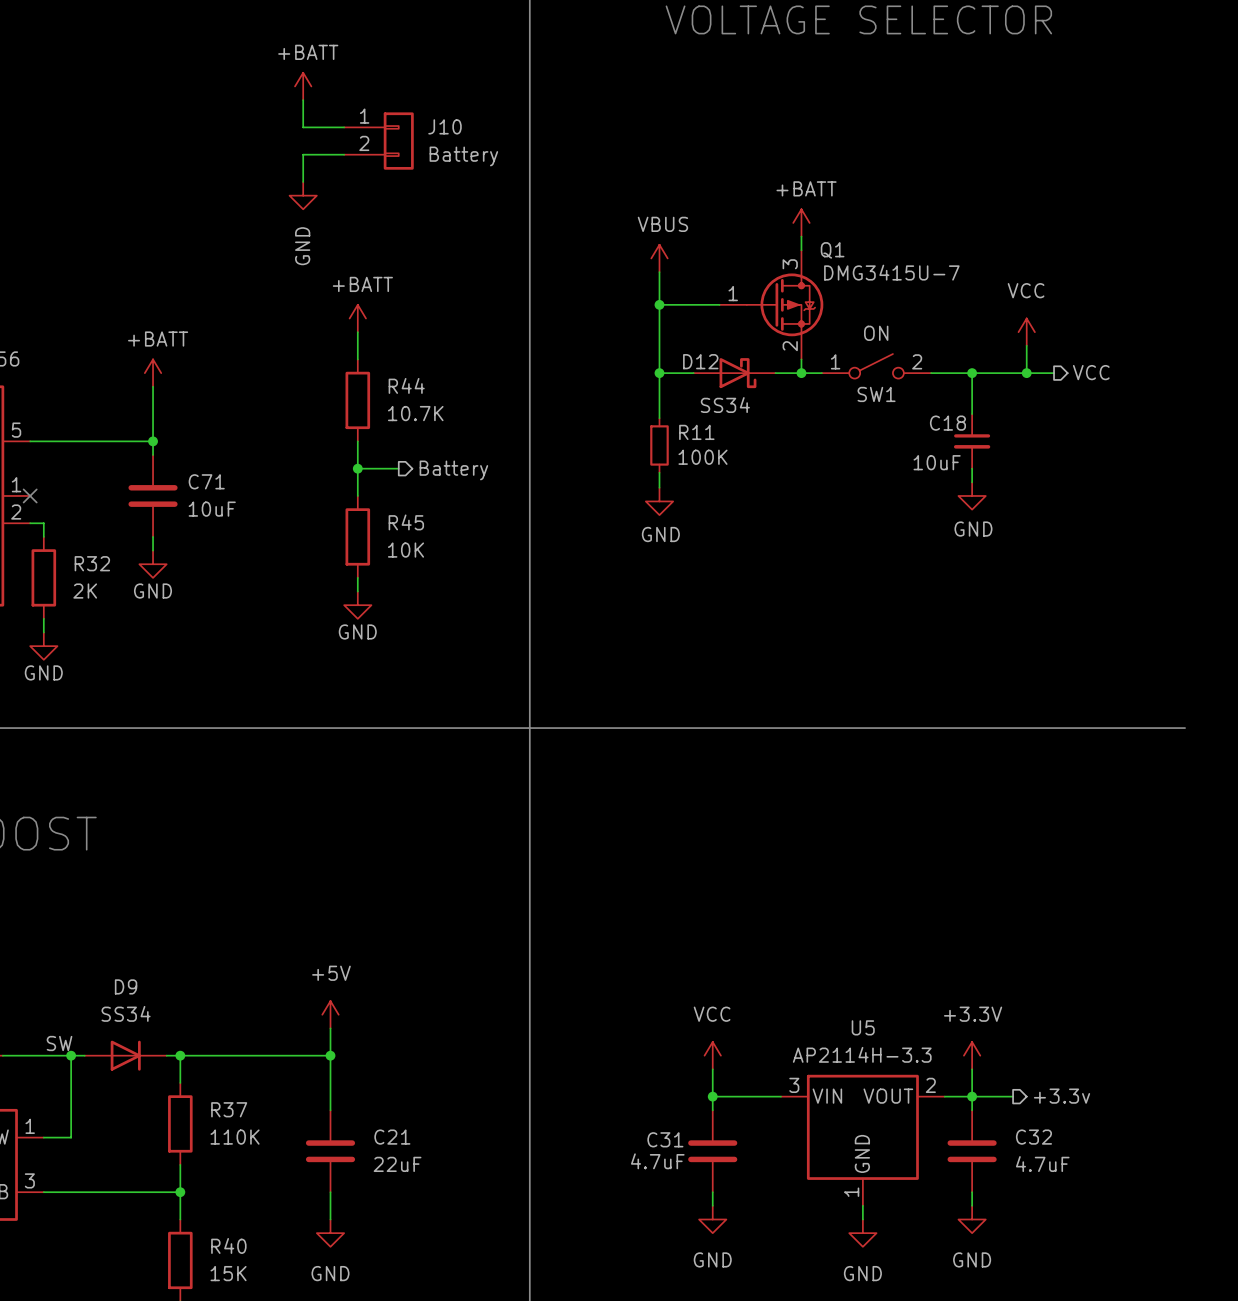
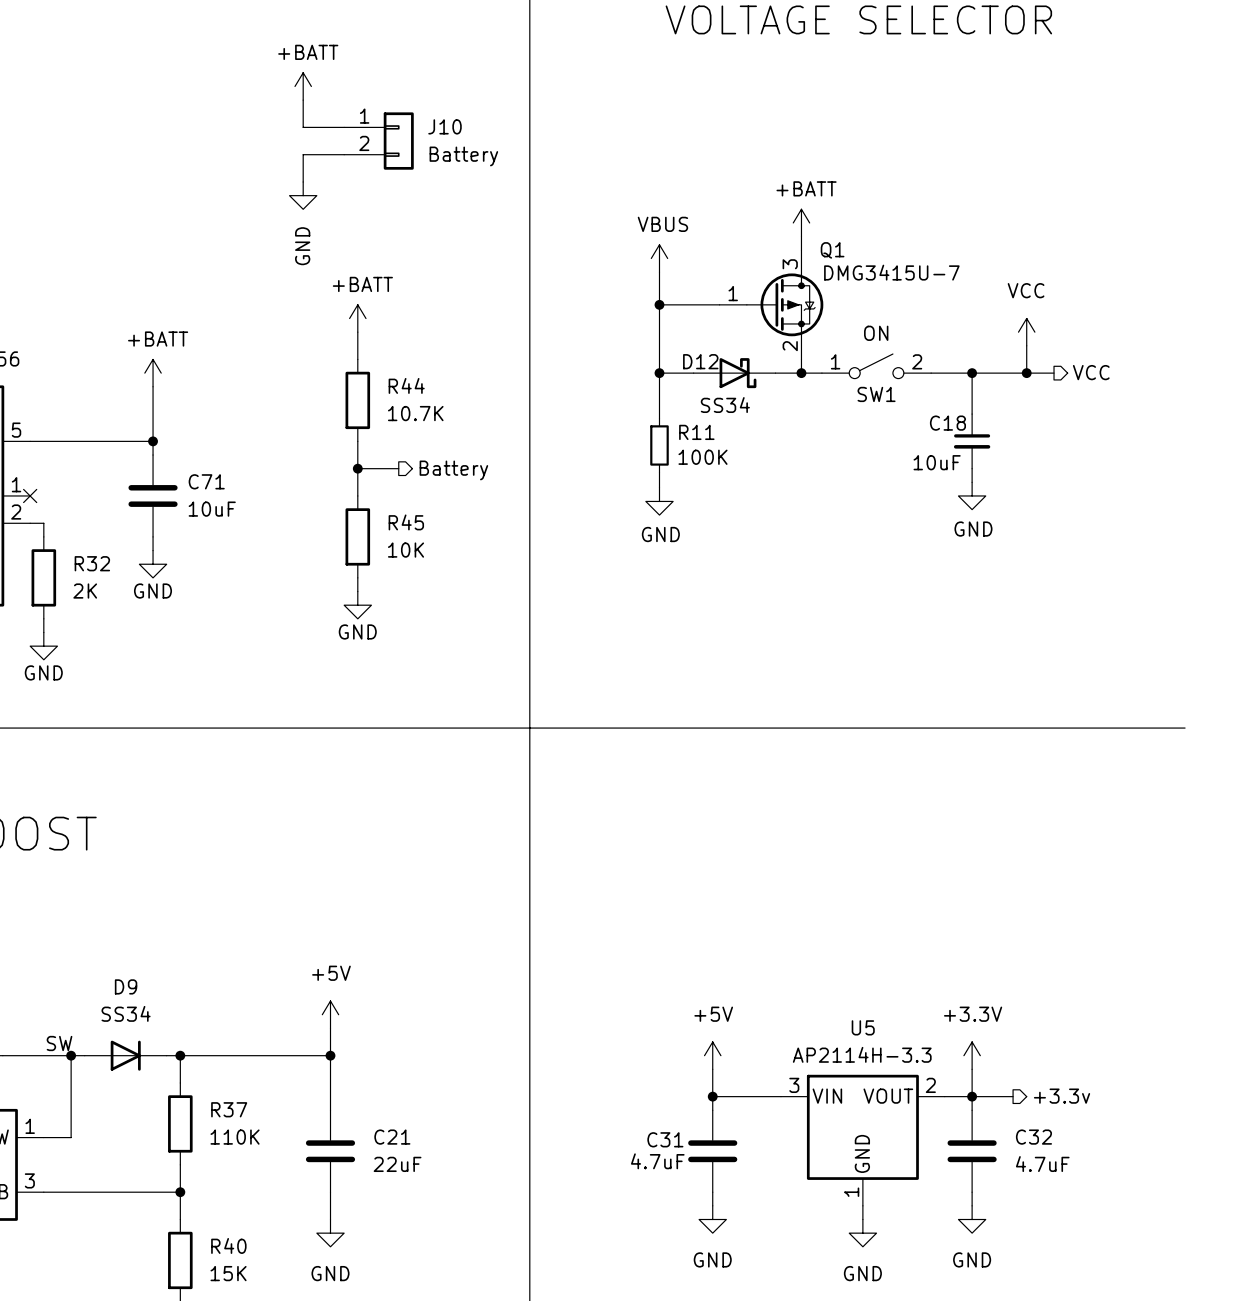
power symbol: VCC (712, 1055) -> +5V (712, 1055)

